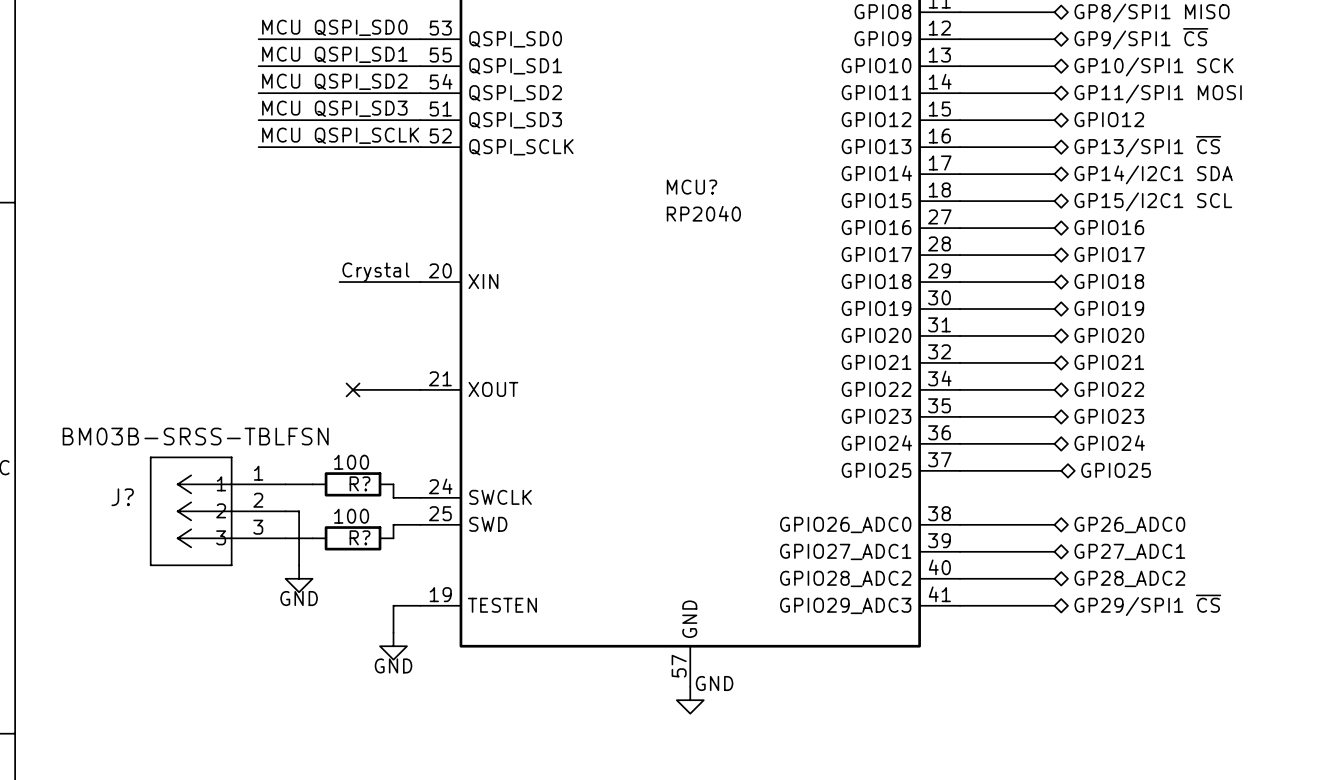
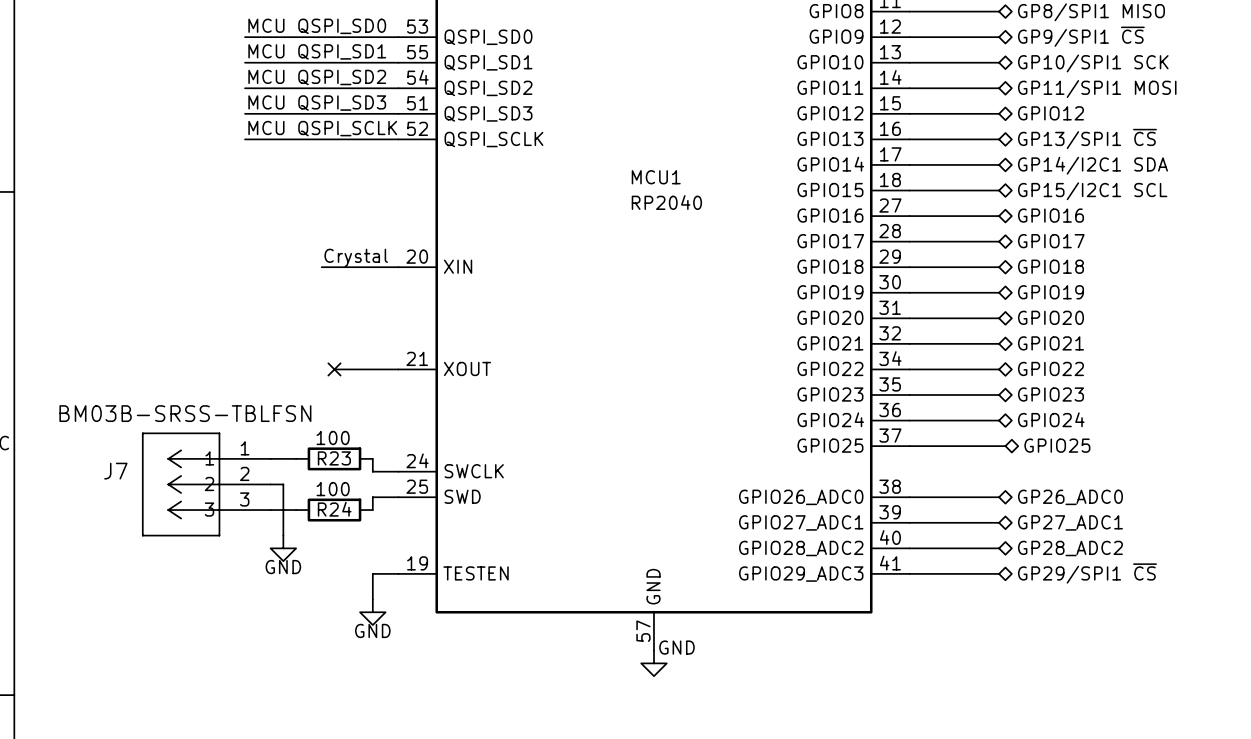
MCU? name: MCU? (691, 187) -> MCU1 (656, 177)
R? name: R? (360, 483) -> R23 (334, 458)
J? name: J? (122, 497) -> J7 (115, 471)
R? name: R? (360, 537) -> R24 (334, 509)

